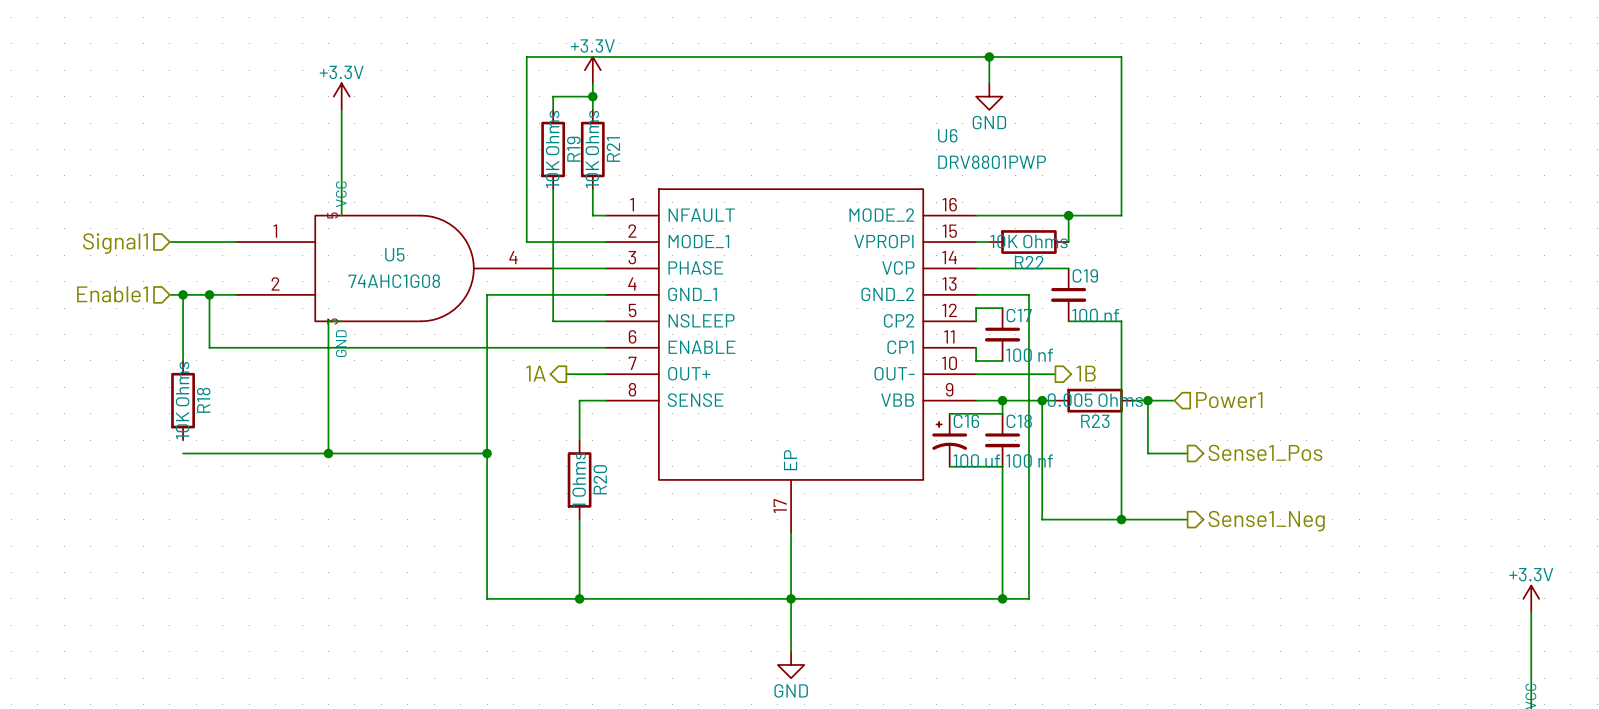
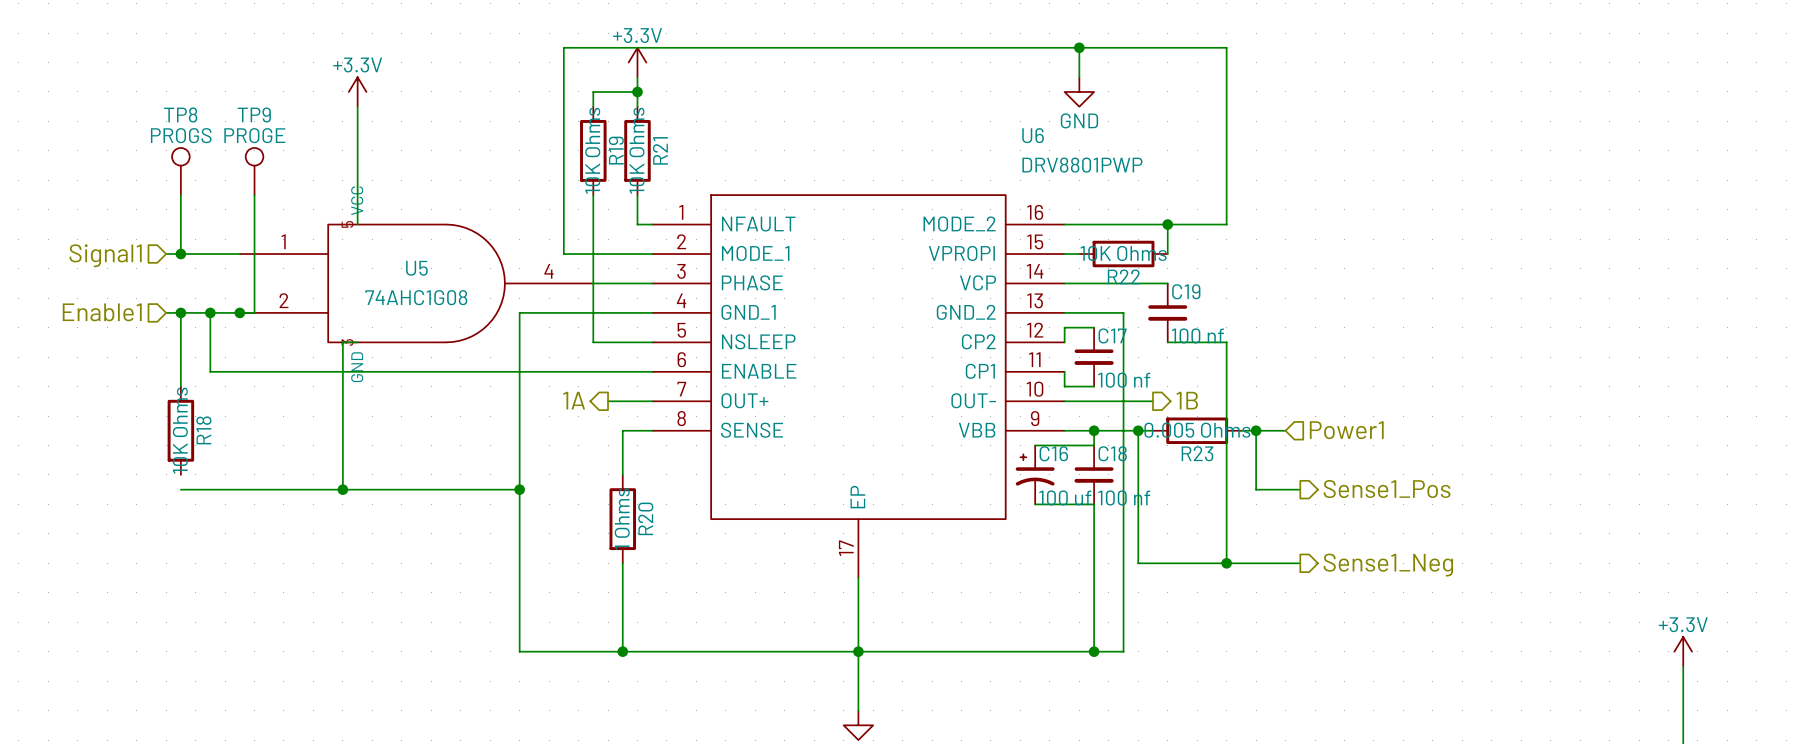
TP8: none -> PROGS (180, 171)
TP9: none -> PROGE (254, 171)
wire: none -> (180, 195) (180, 254)
wire: none -> (254, 195) (254, 312) (239, 312)
junction: none -> (180, 254)
junction: none -> (239, 312)

